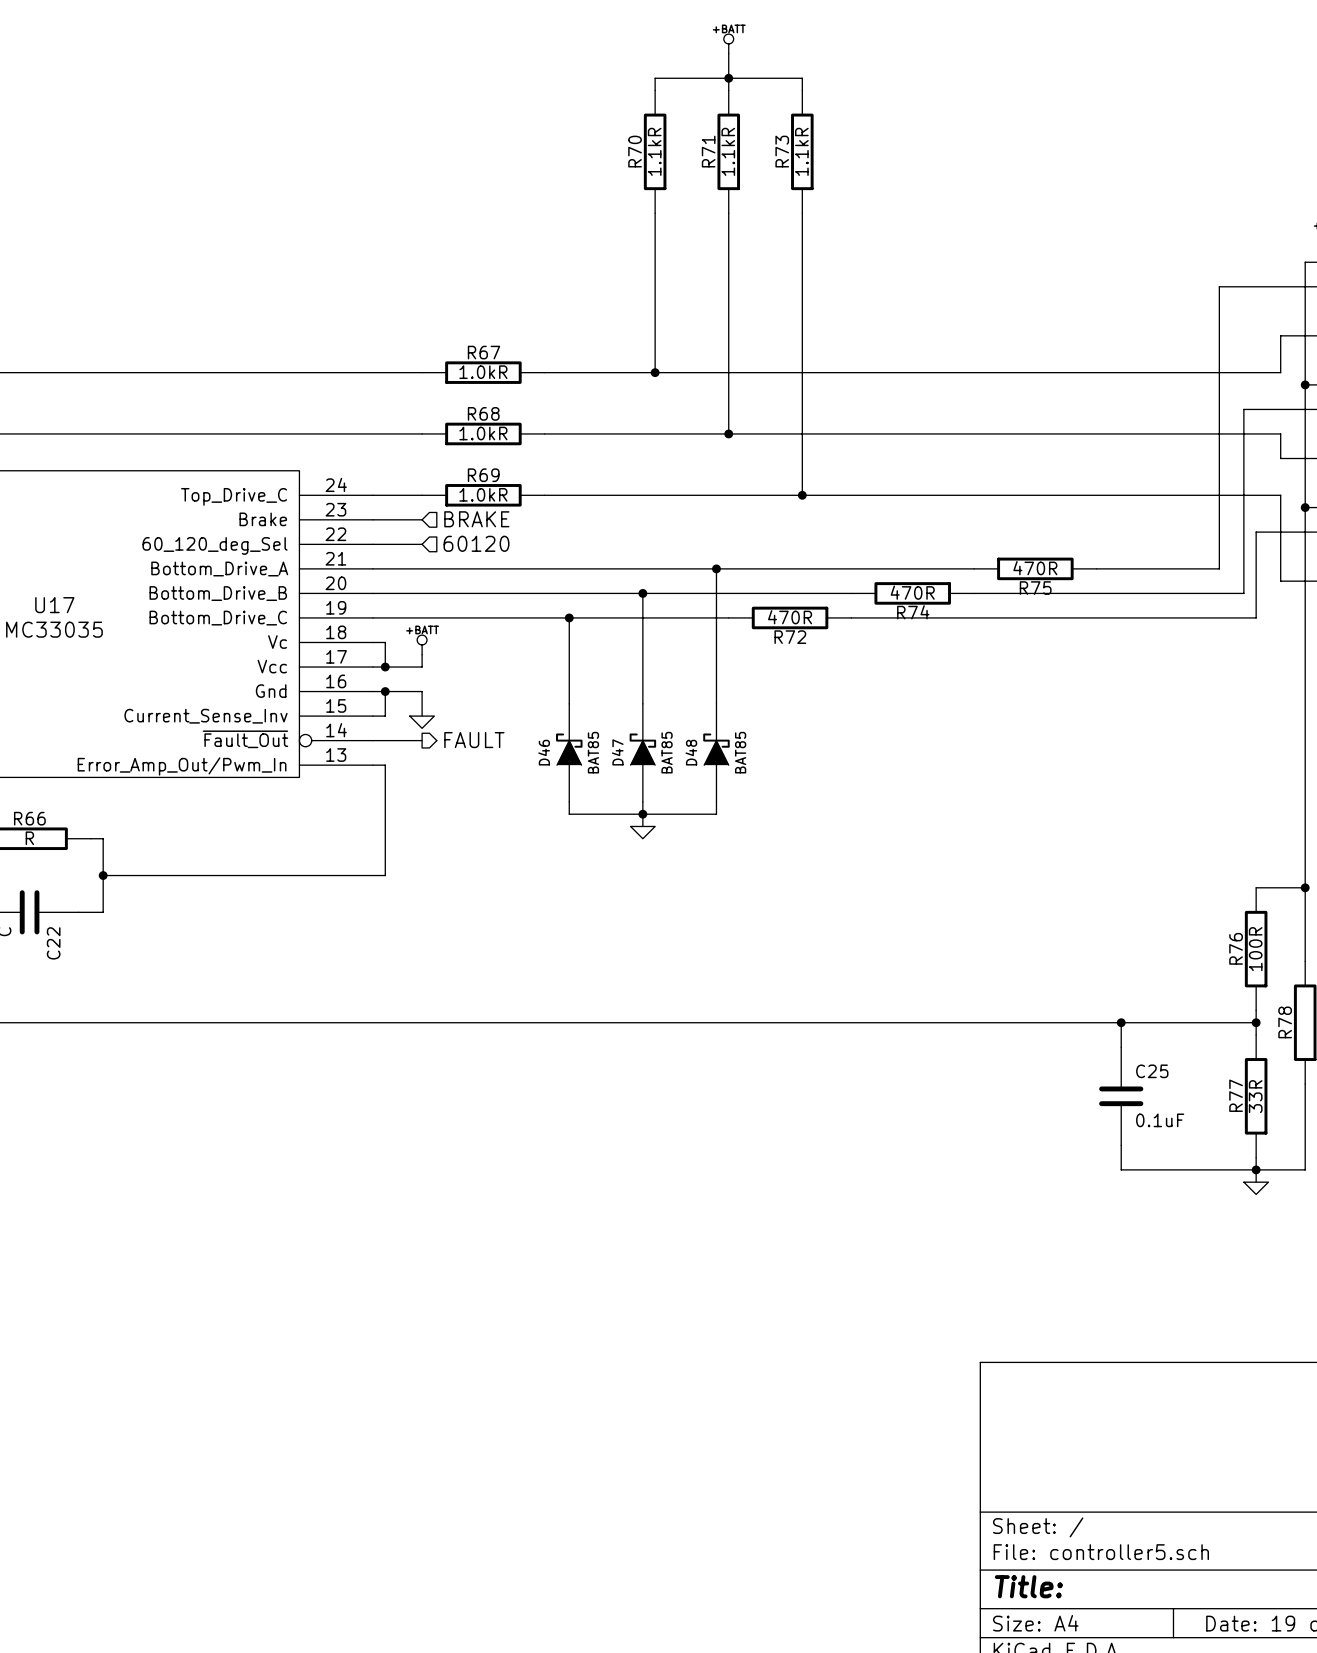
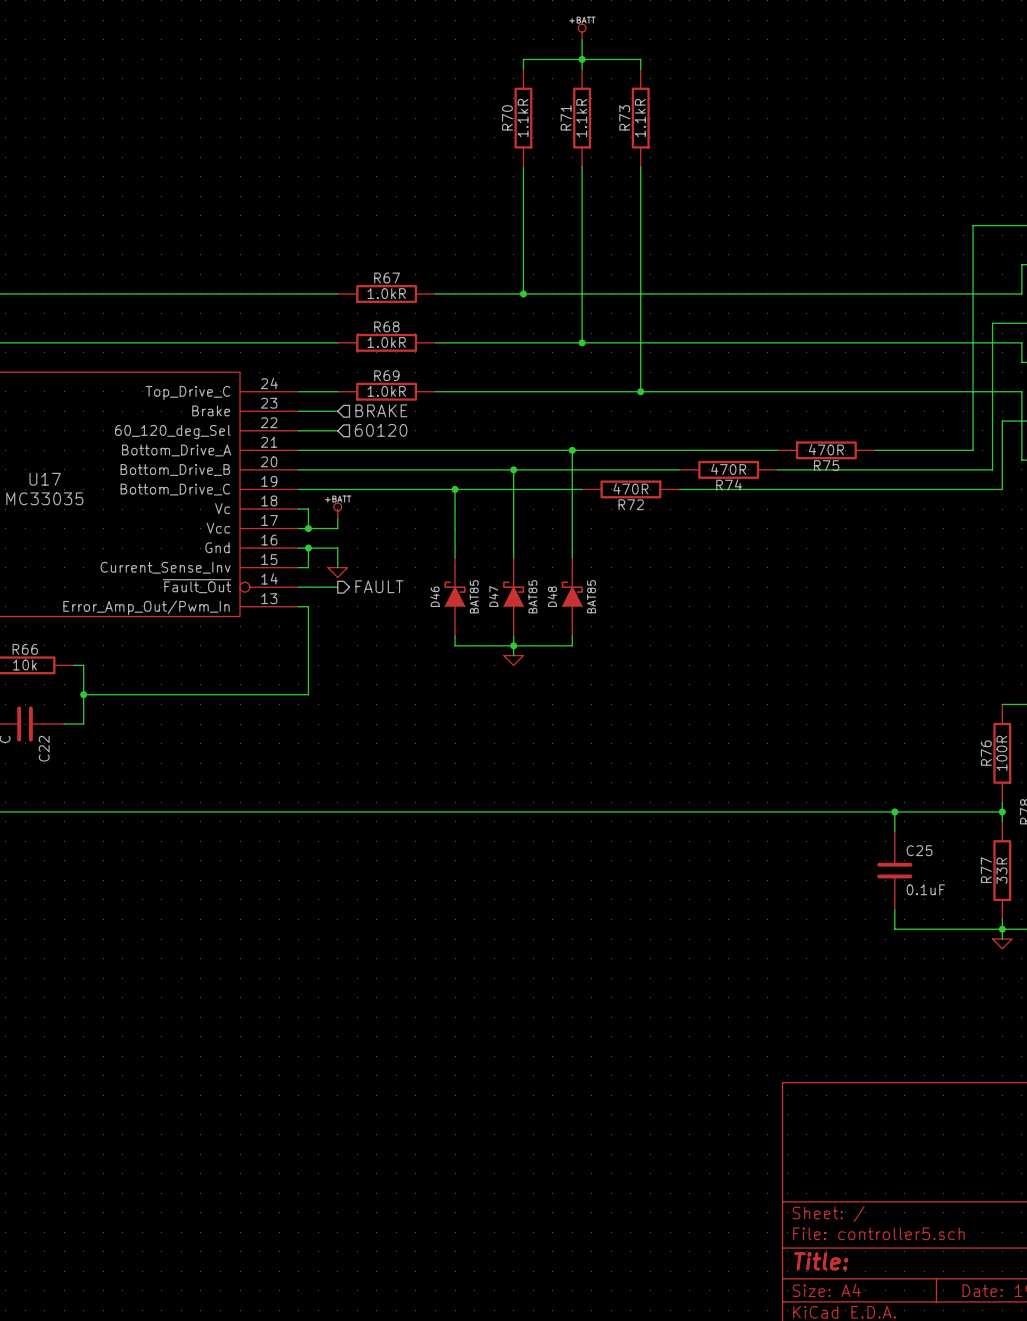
R66 value: R (29, 838) -> 10k (25, 665)

